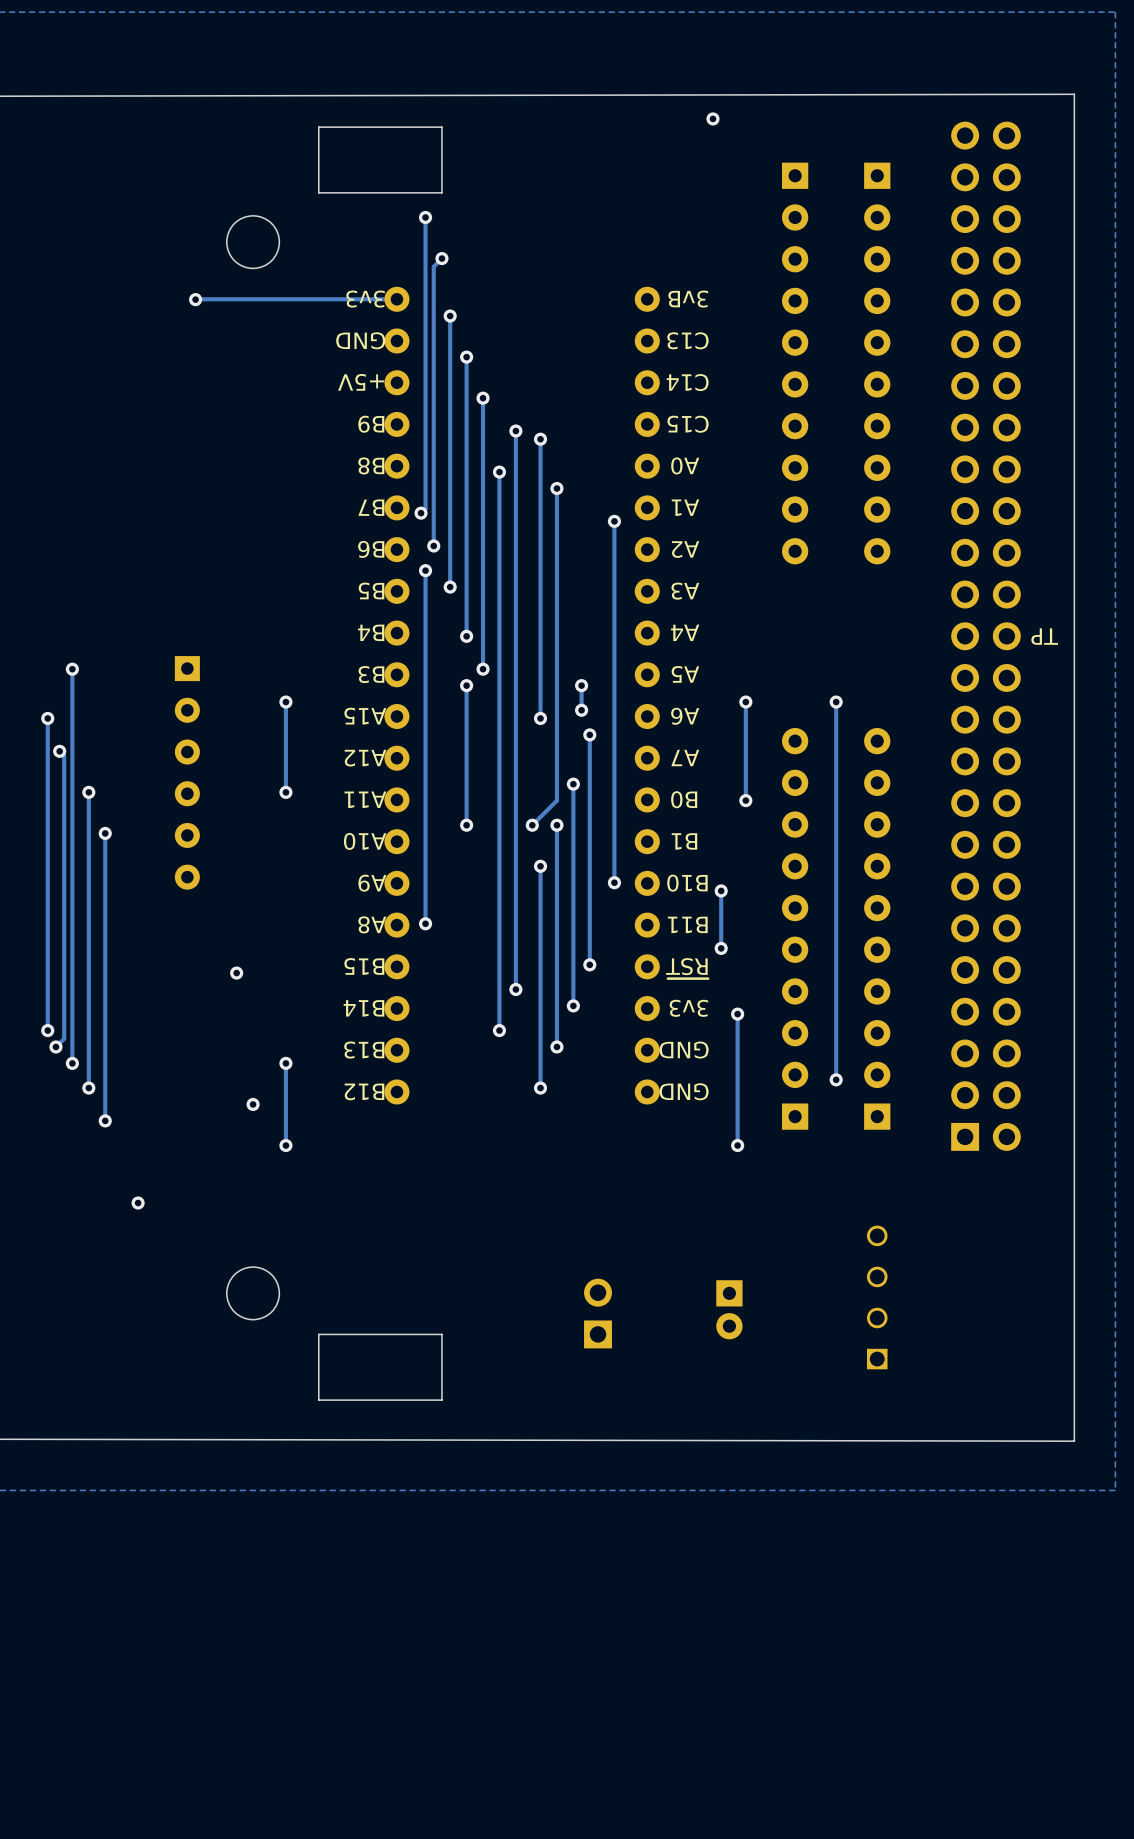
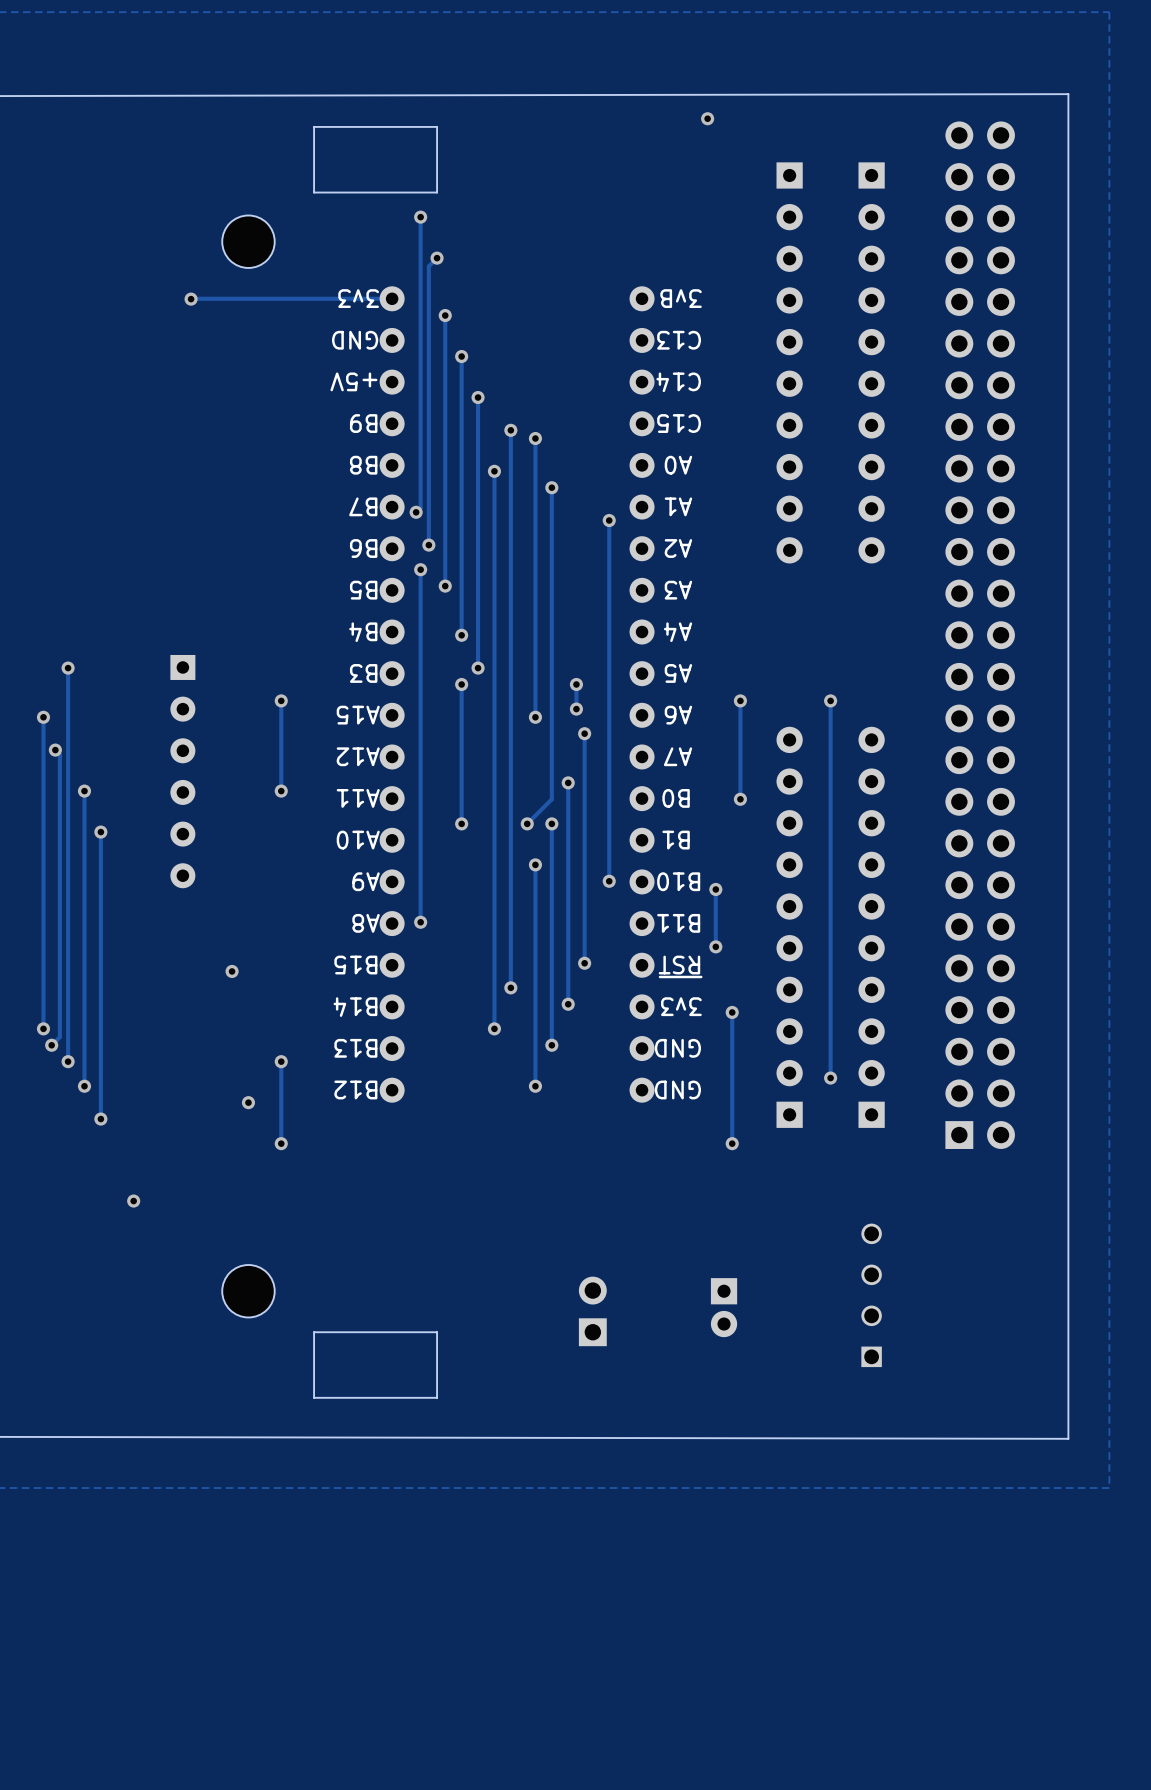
text: TP (1044, 636) -> none

